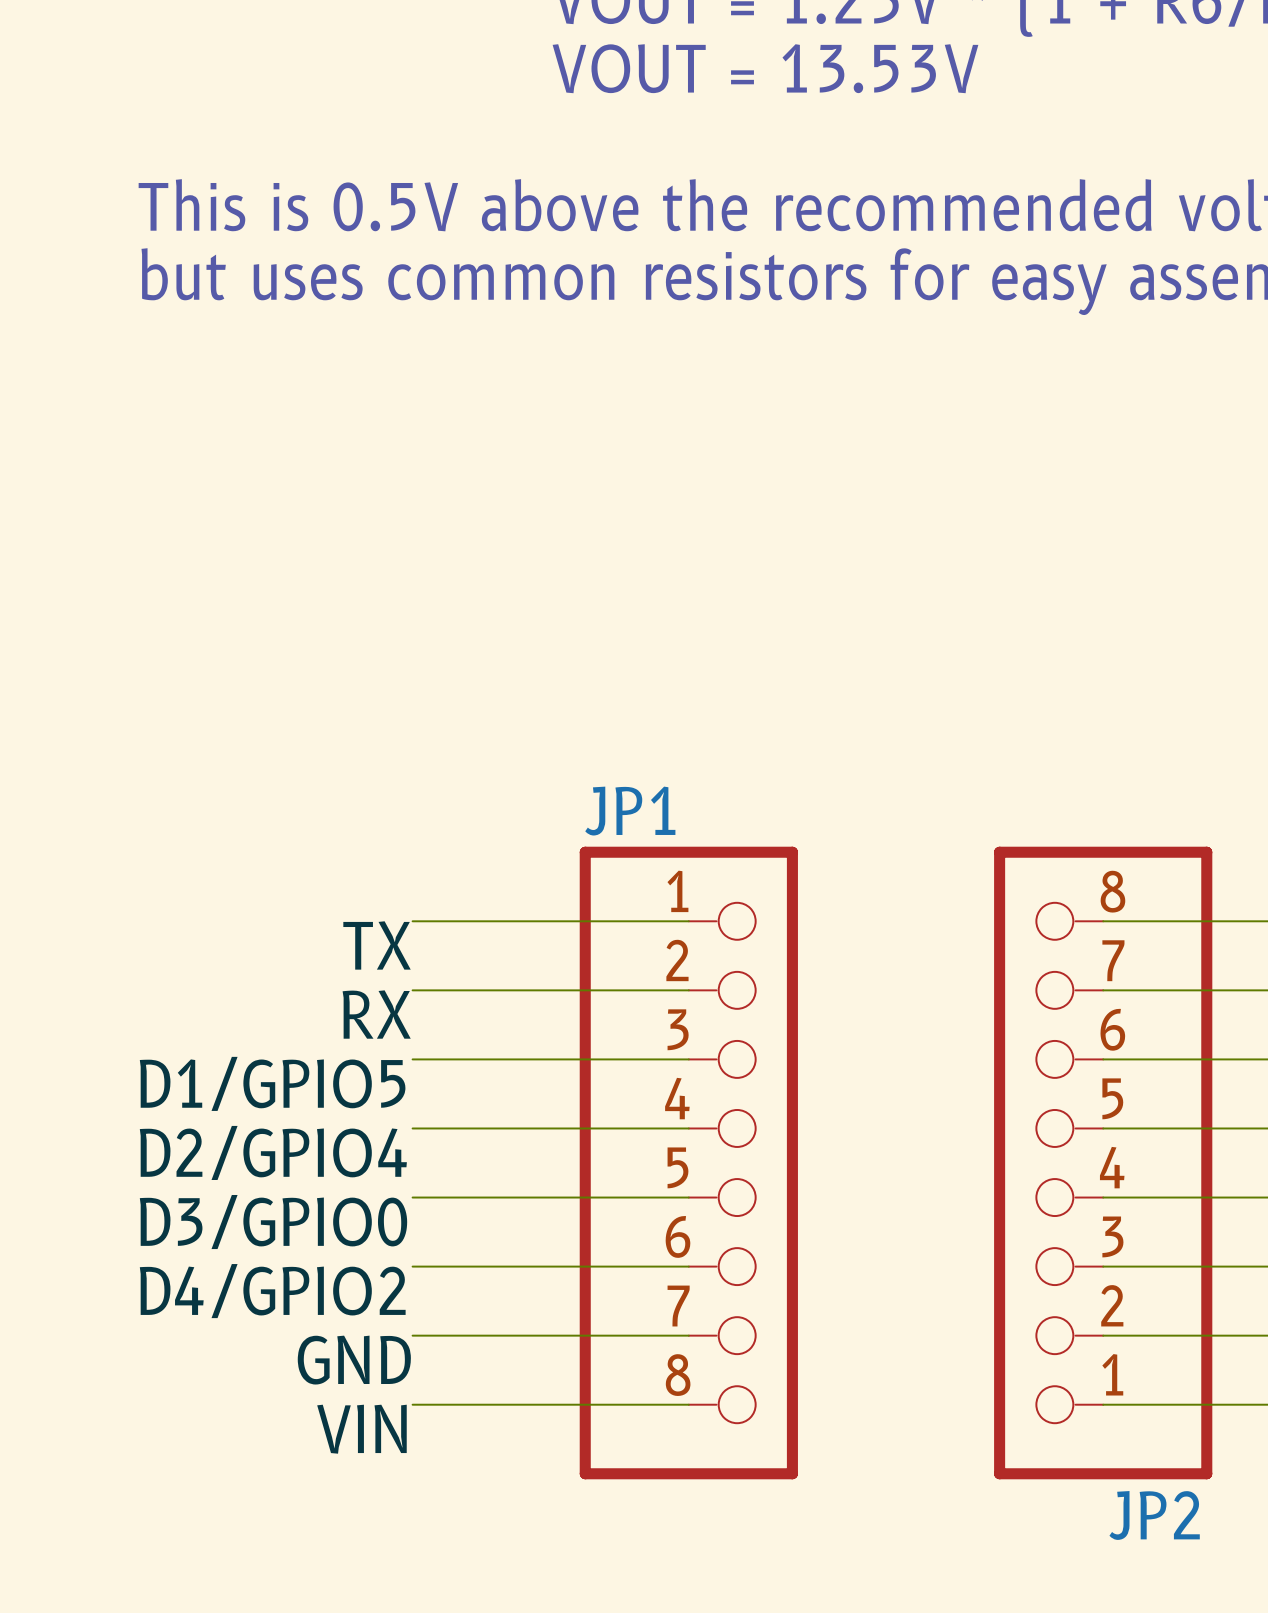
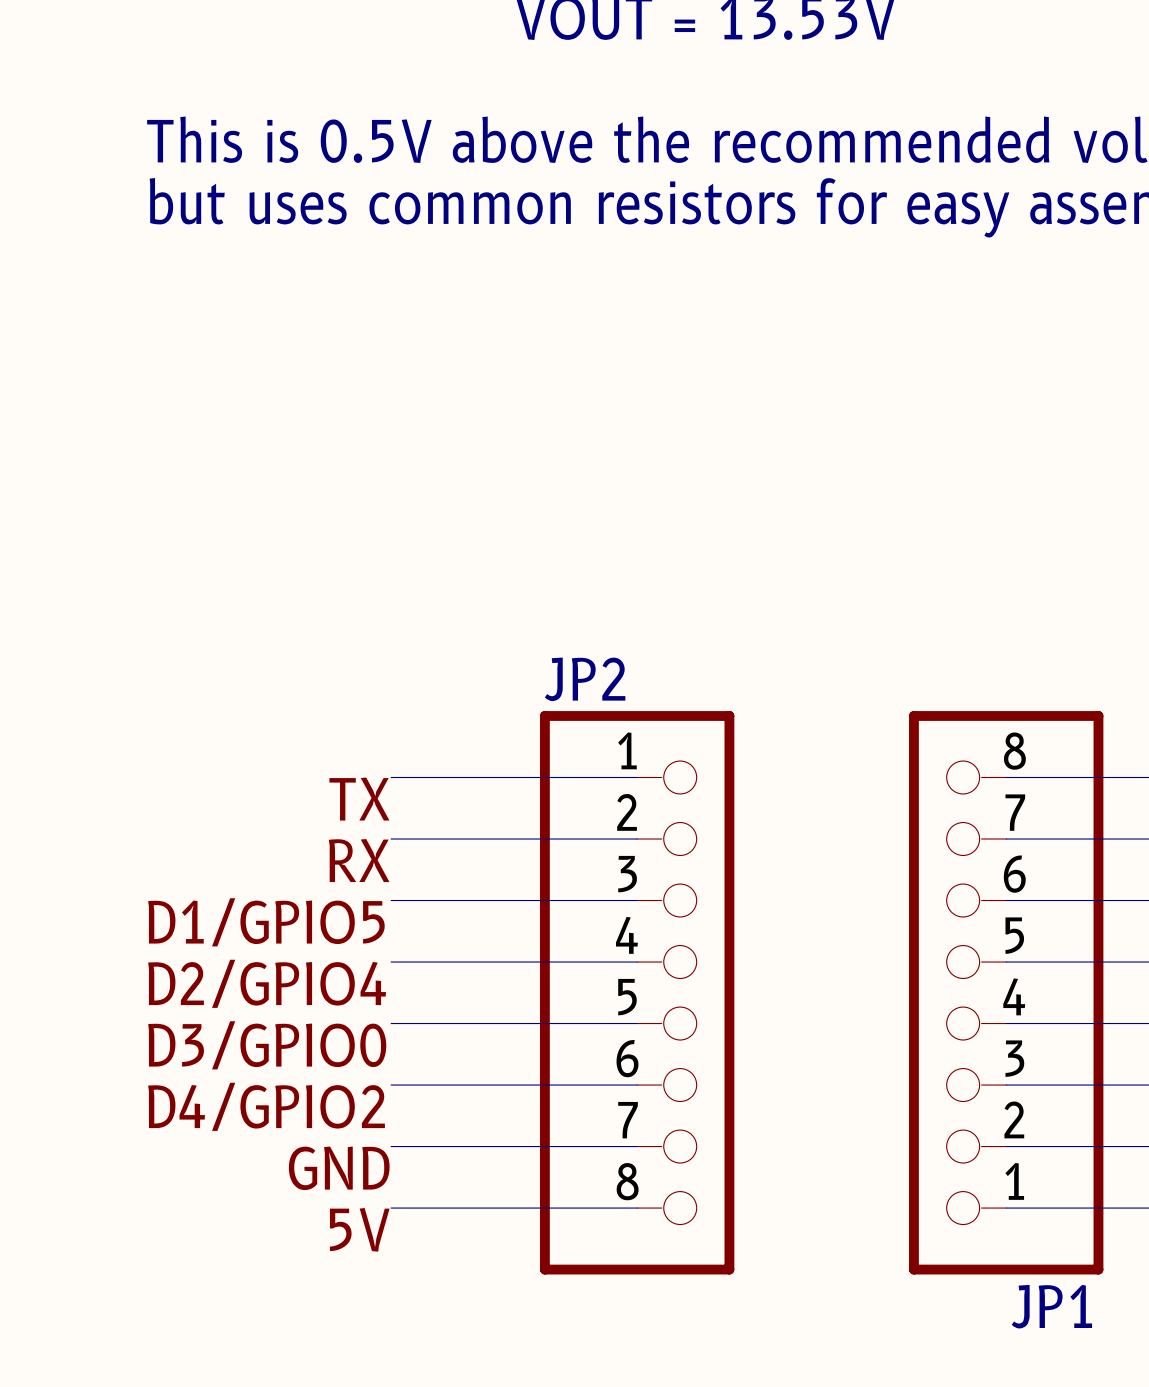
JP1 name: JP1 (630, 811) -> JP2 (585, 679)
label: VIN (361, 1429) -> 5V (359, 1229)
JP2 name: JP2 (1154, 1515) -> JP1 (1051, 1306)

